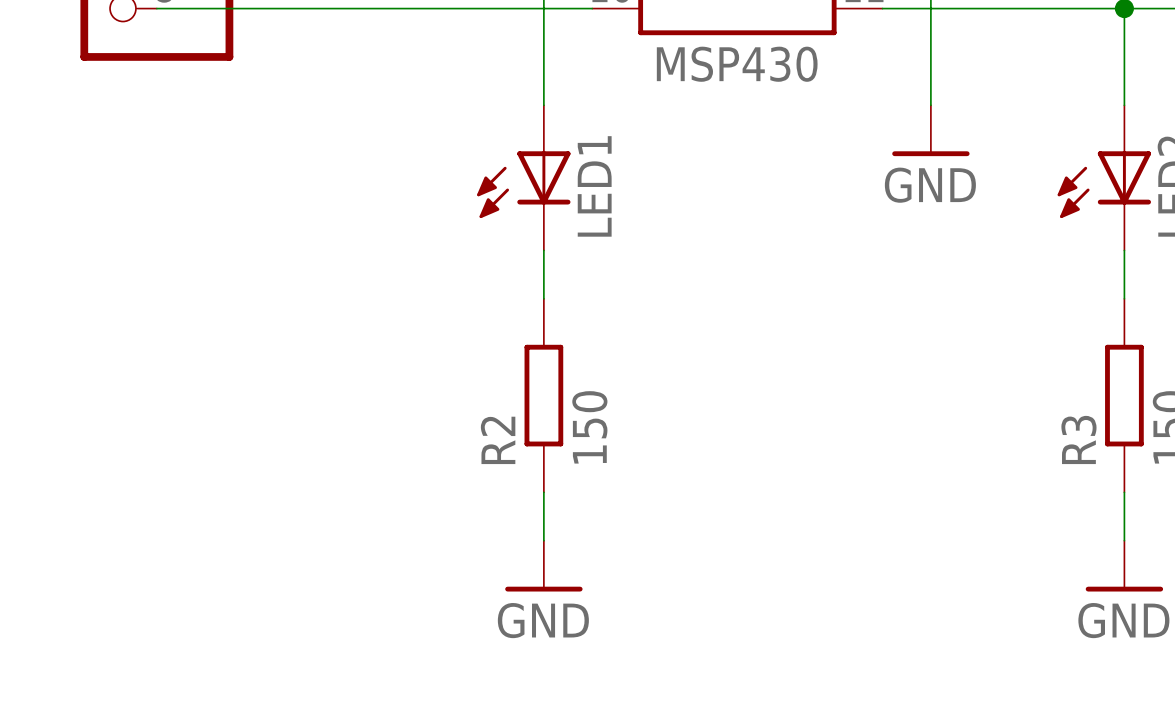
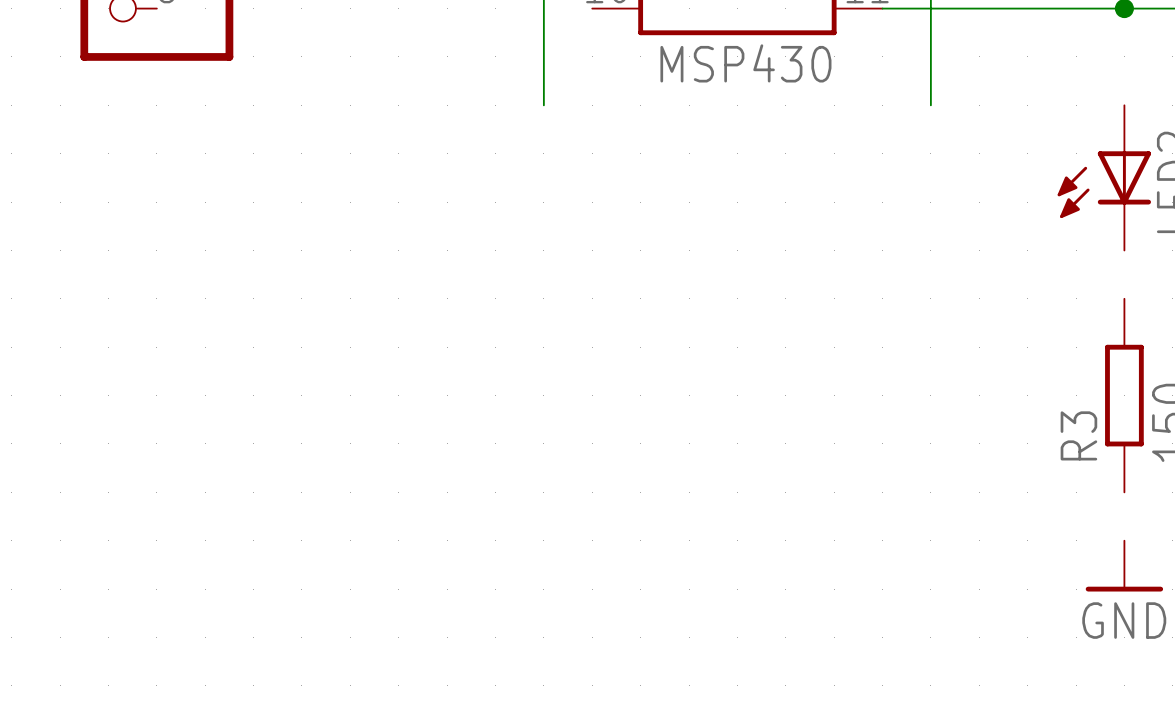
wire: (156, 8) (592, 8) -> none
wire: (1124, 8) (1124, 105) -> none
power symbol: GND (930, 130) -> none
LED1: (523, 177) -> none
wire: (543, 250) (543, 298) -> none
wire: (1124, 250) (1124, 298) -> none
R2: 150 (543, 395) -> none
wire: (543, 492) (543, 540) -> none
wire: (1124, 492) (1124, 540) -> none
power symbol: GND (543, 566) -> none

